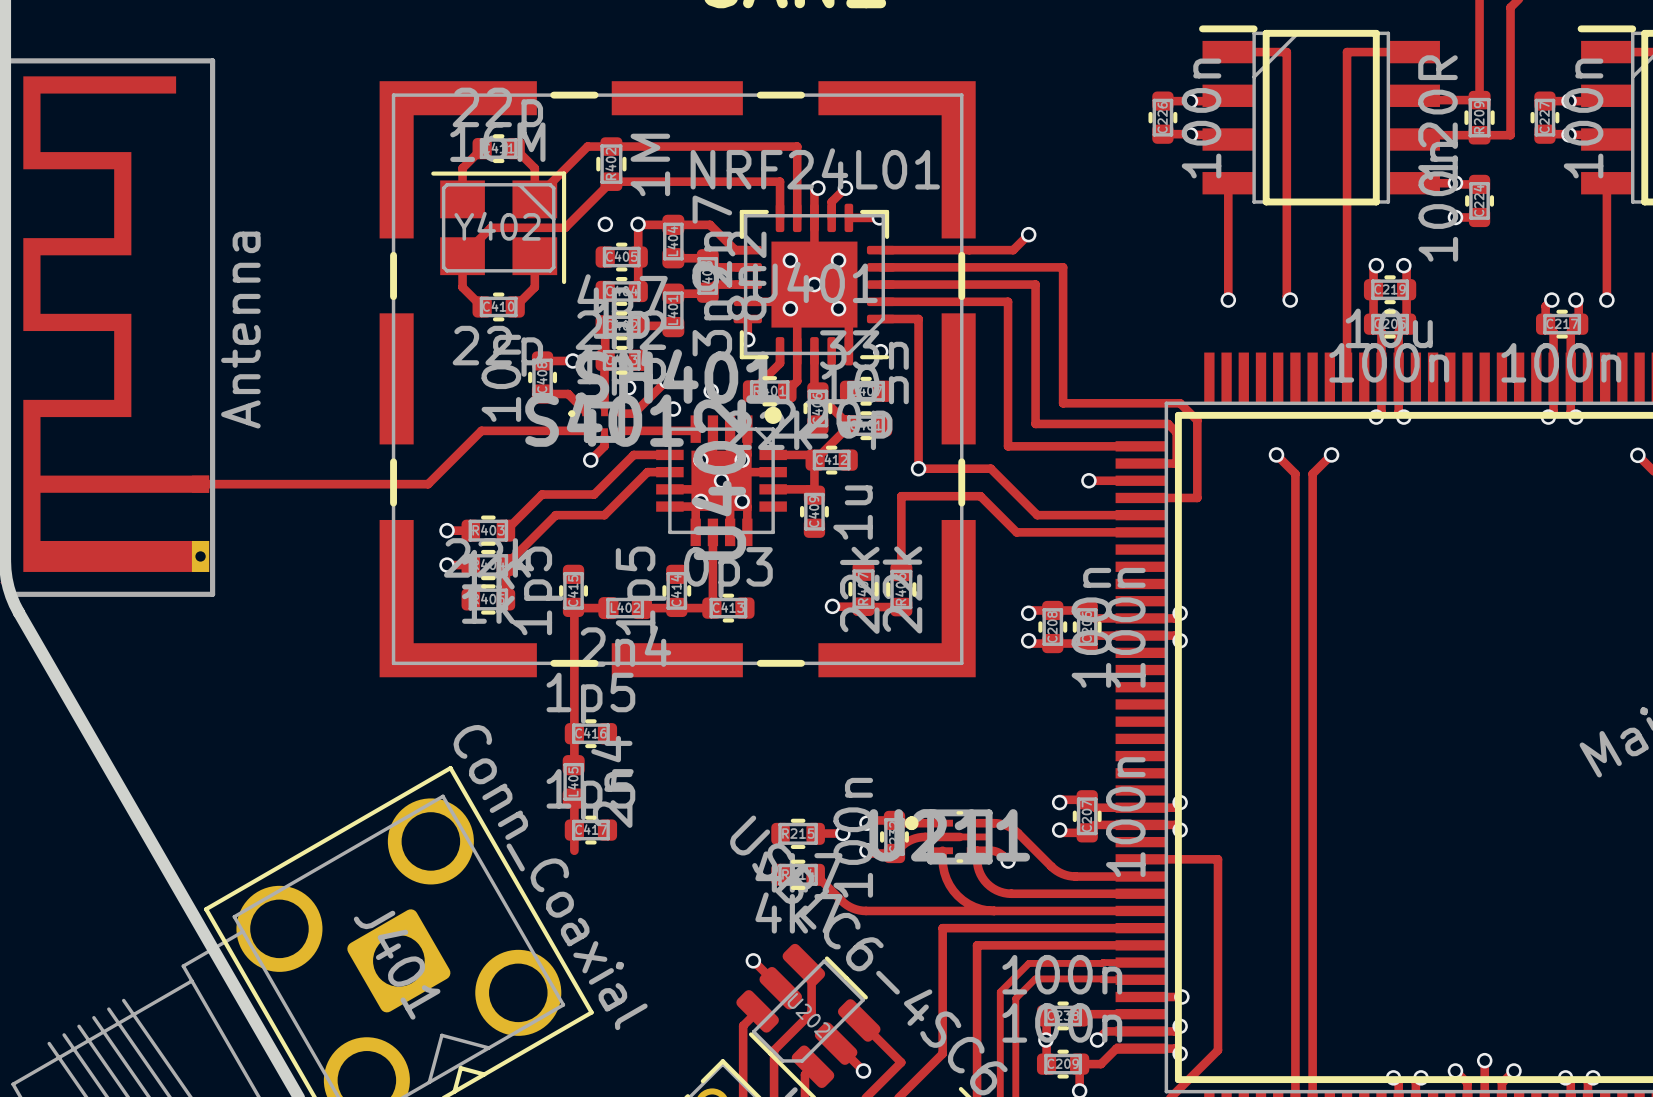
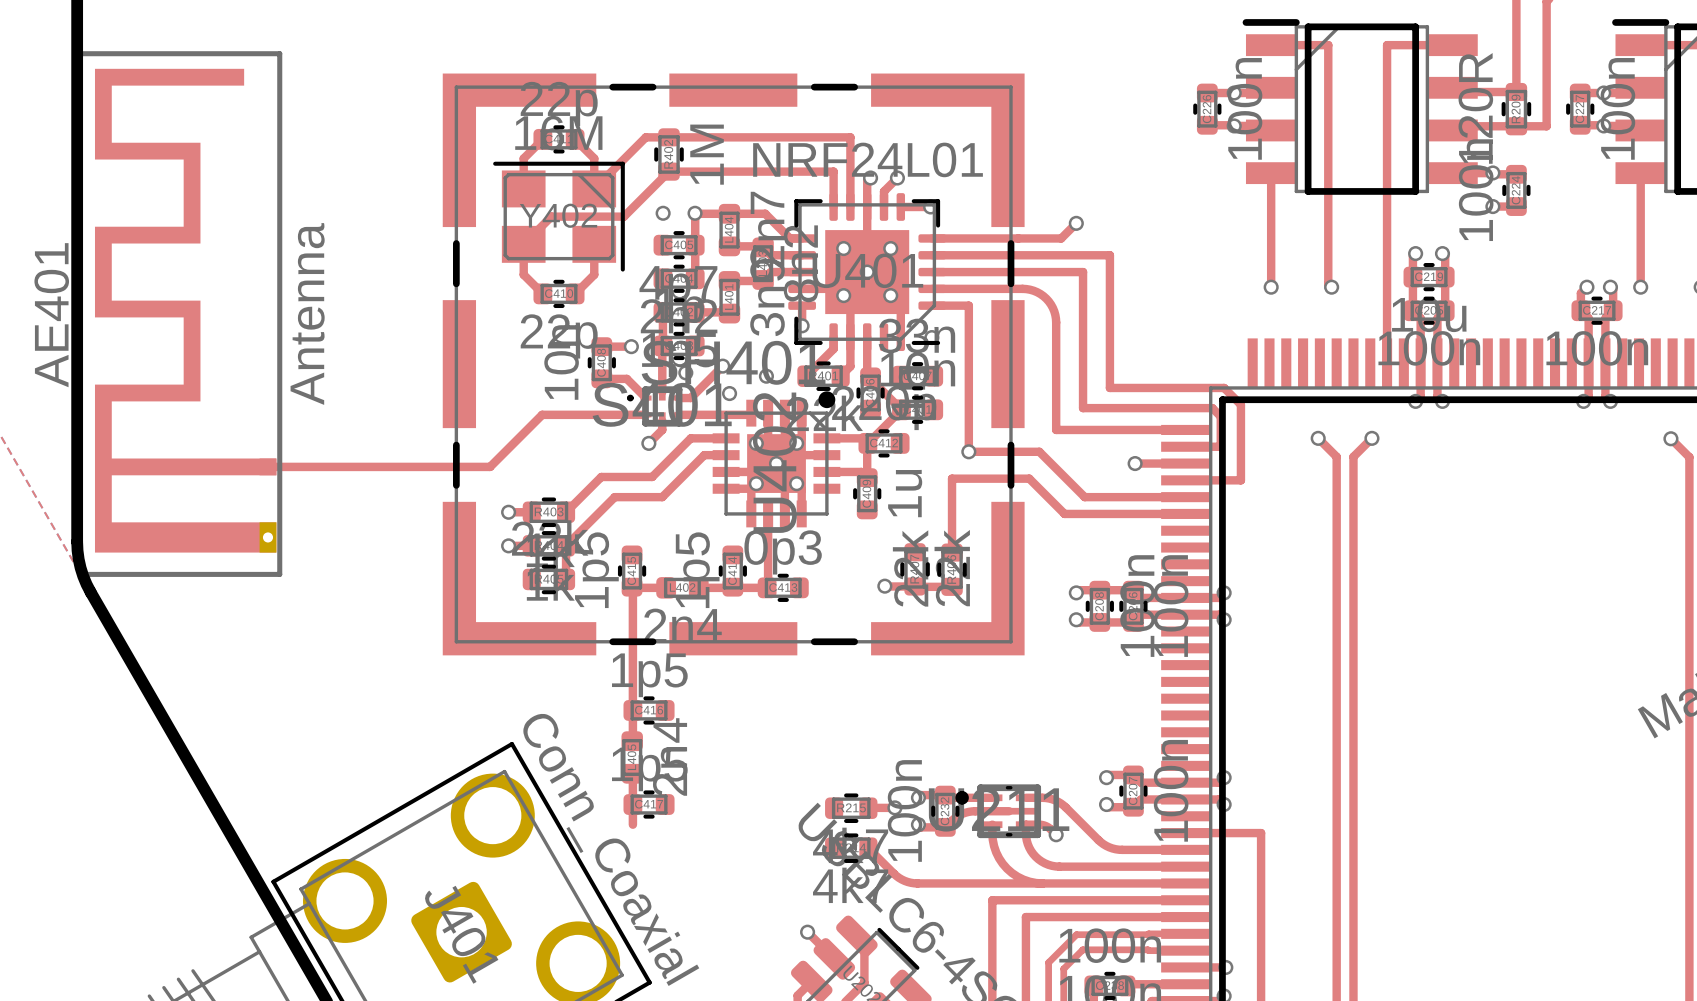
top track: (973, 301) (1008, 301) (1008, 336) -> (1022, 288) (1033, 290) (1046, 298) (1052, 307) (1056, 322)

